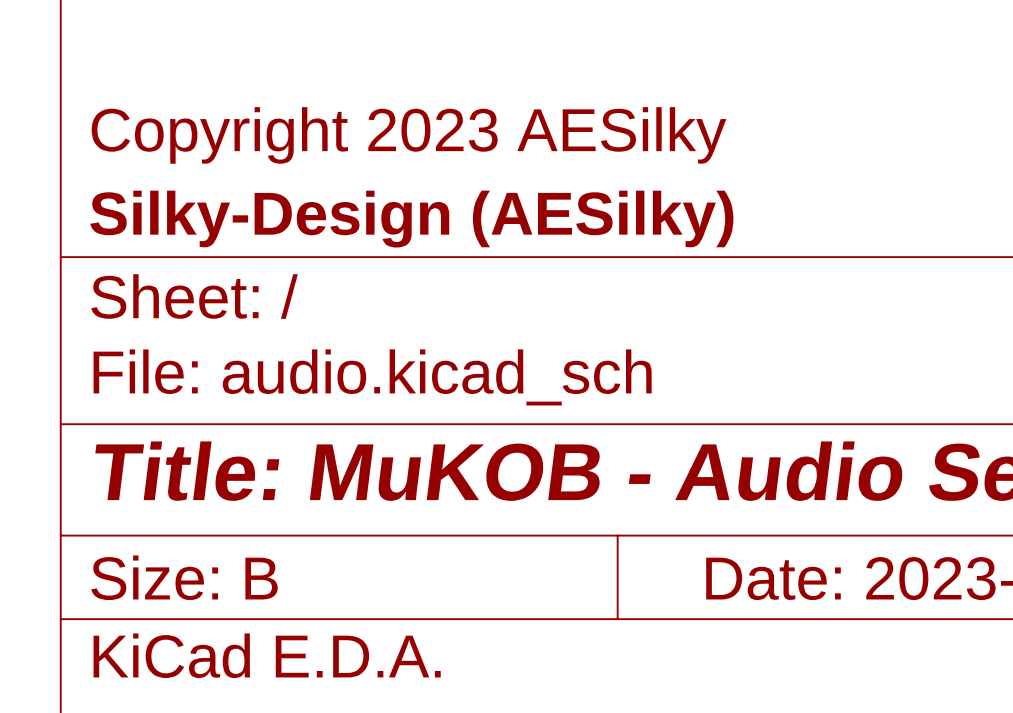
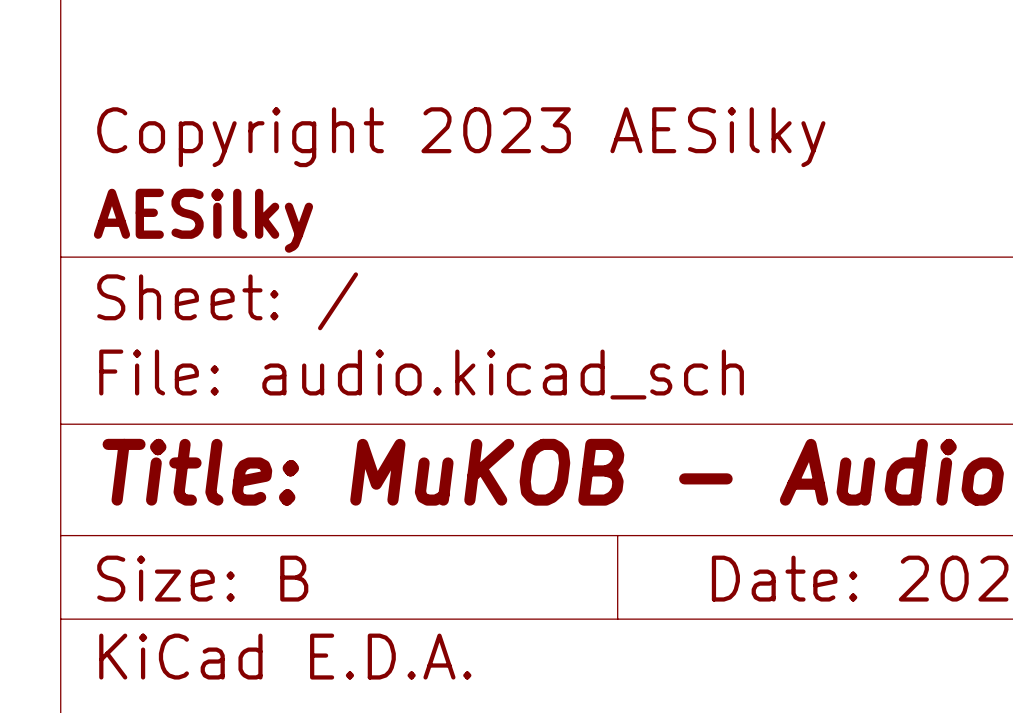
title block: Silky-Design (AESilky) (411, 219) -> AESilky (203, 220)

